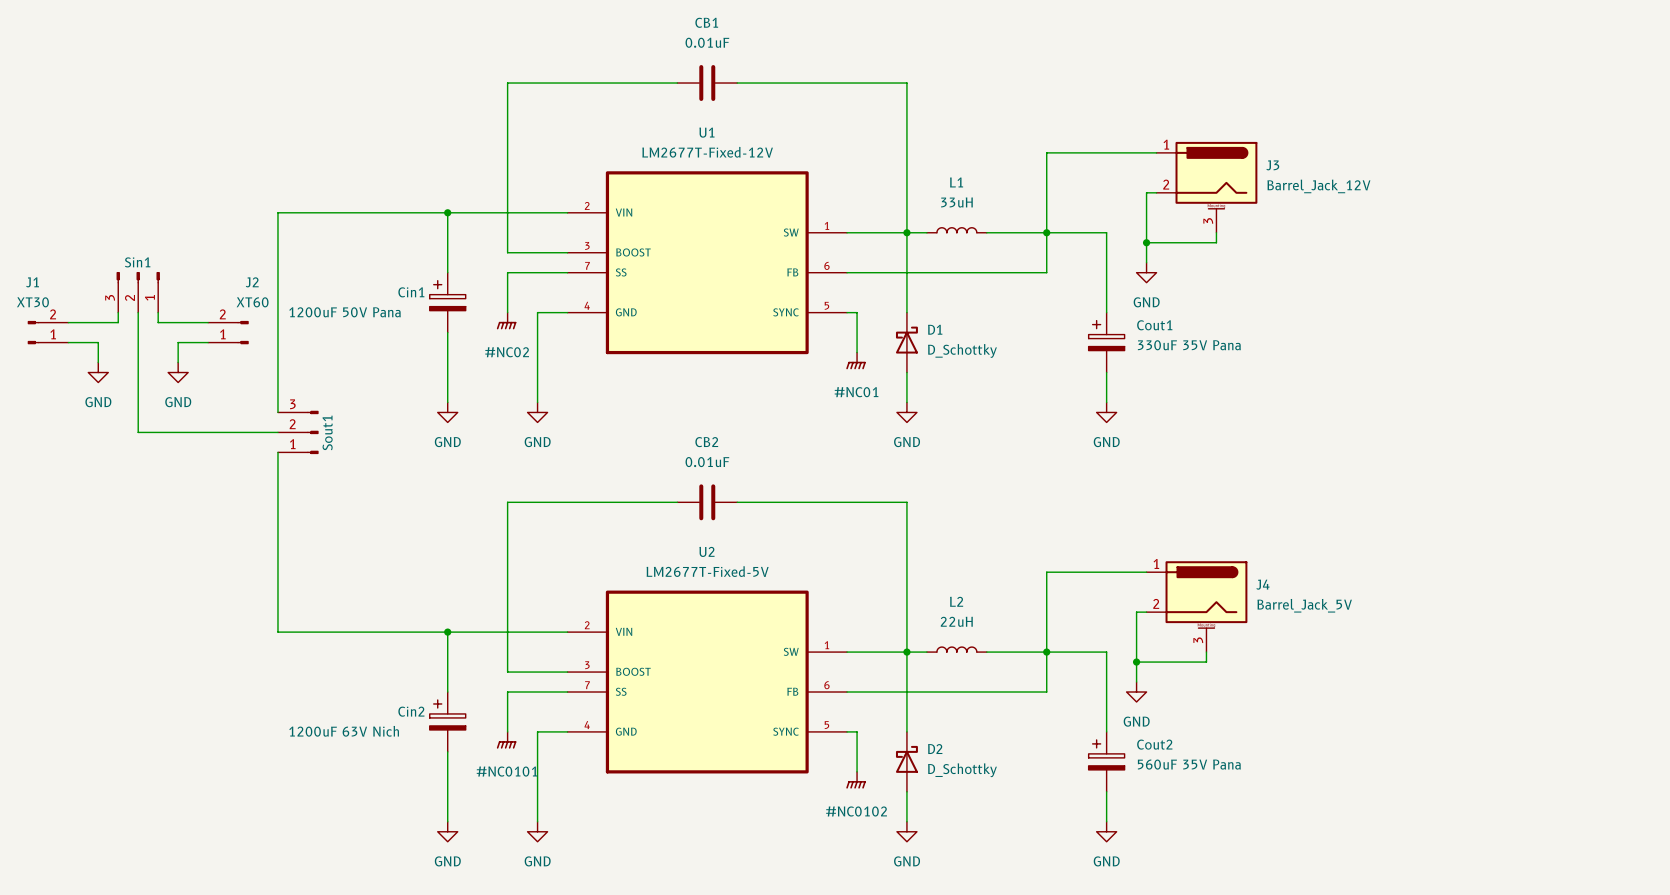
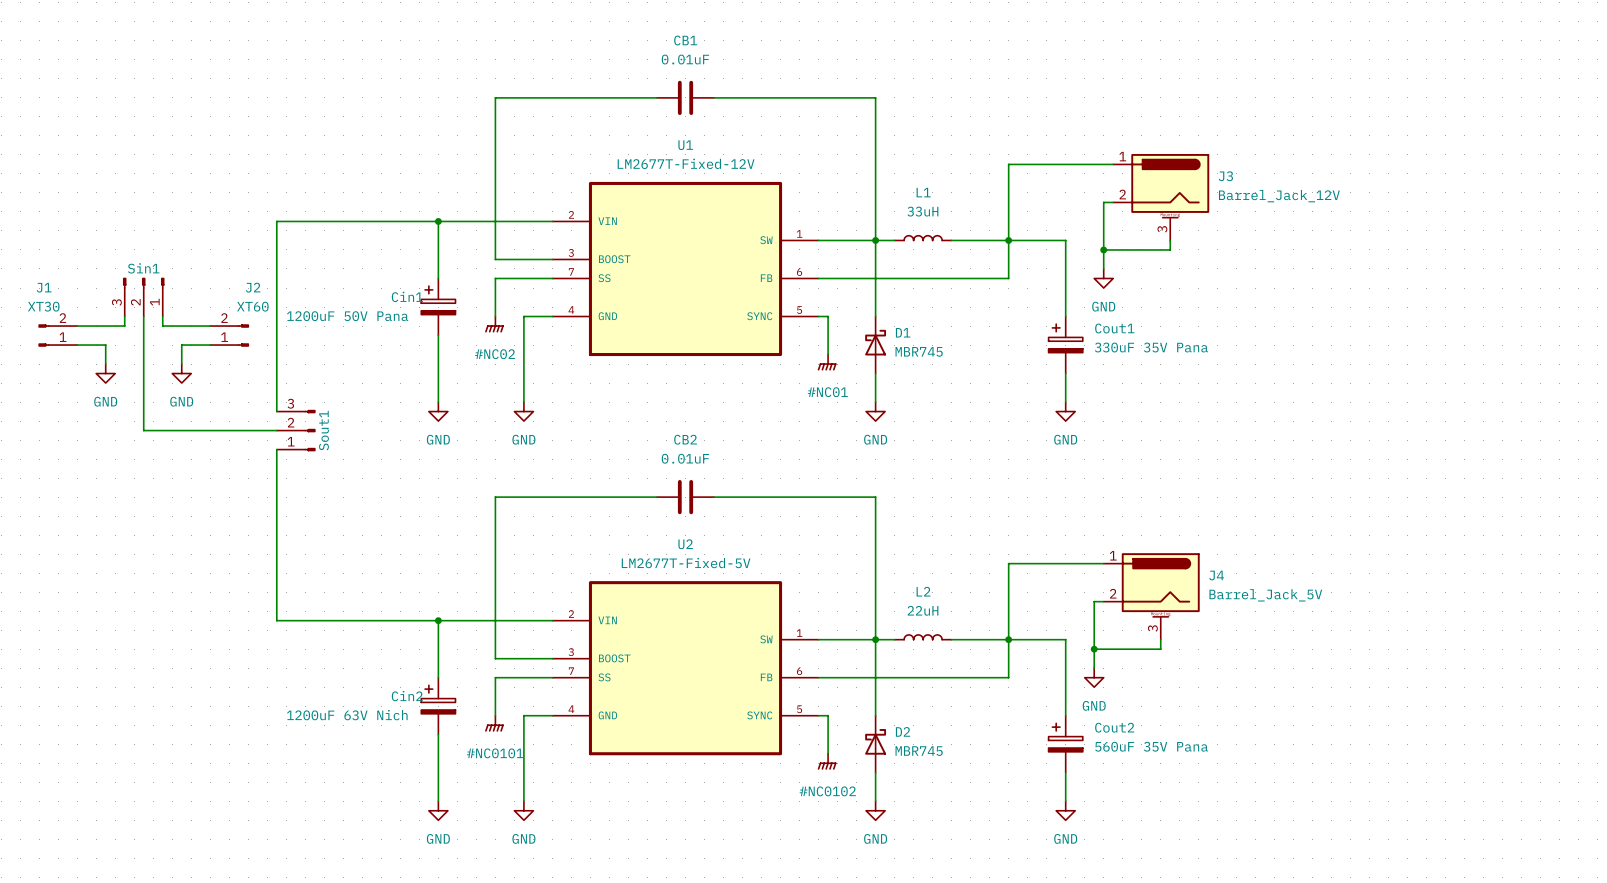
D1 value: D_Schottky (962, 350) -> MBR745 (919, 351)
D2 value: D_Schottky (962, 770) -> MBR745 (919, 751)

